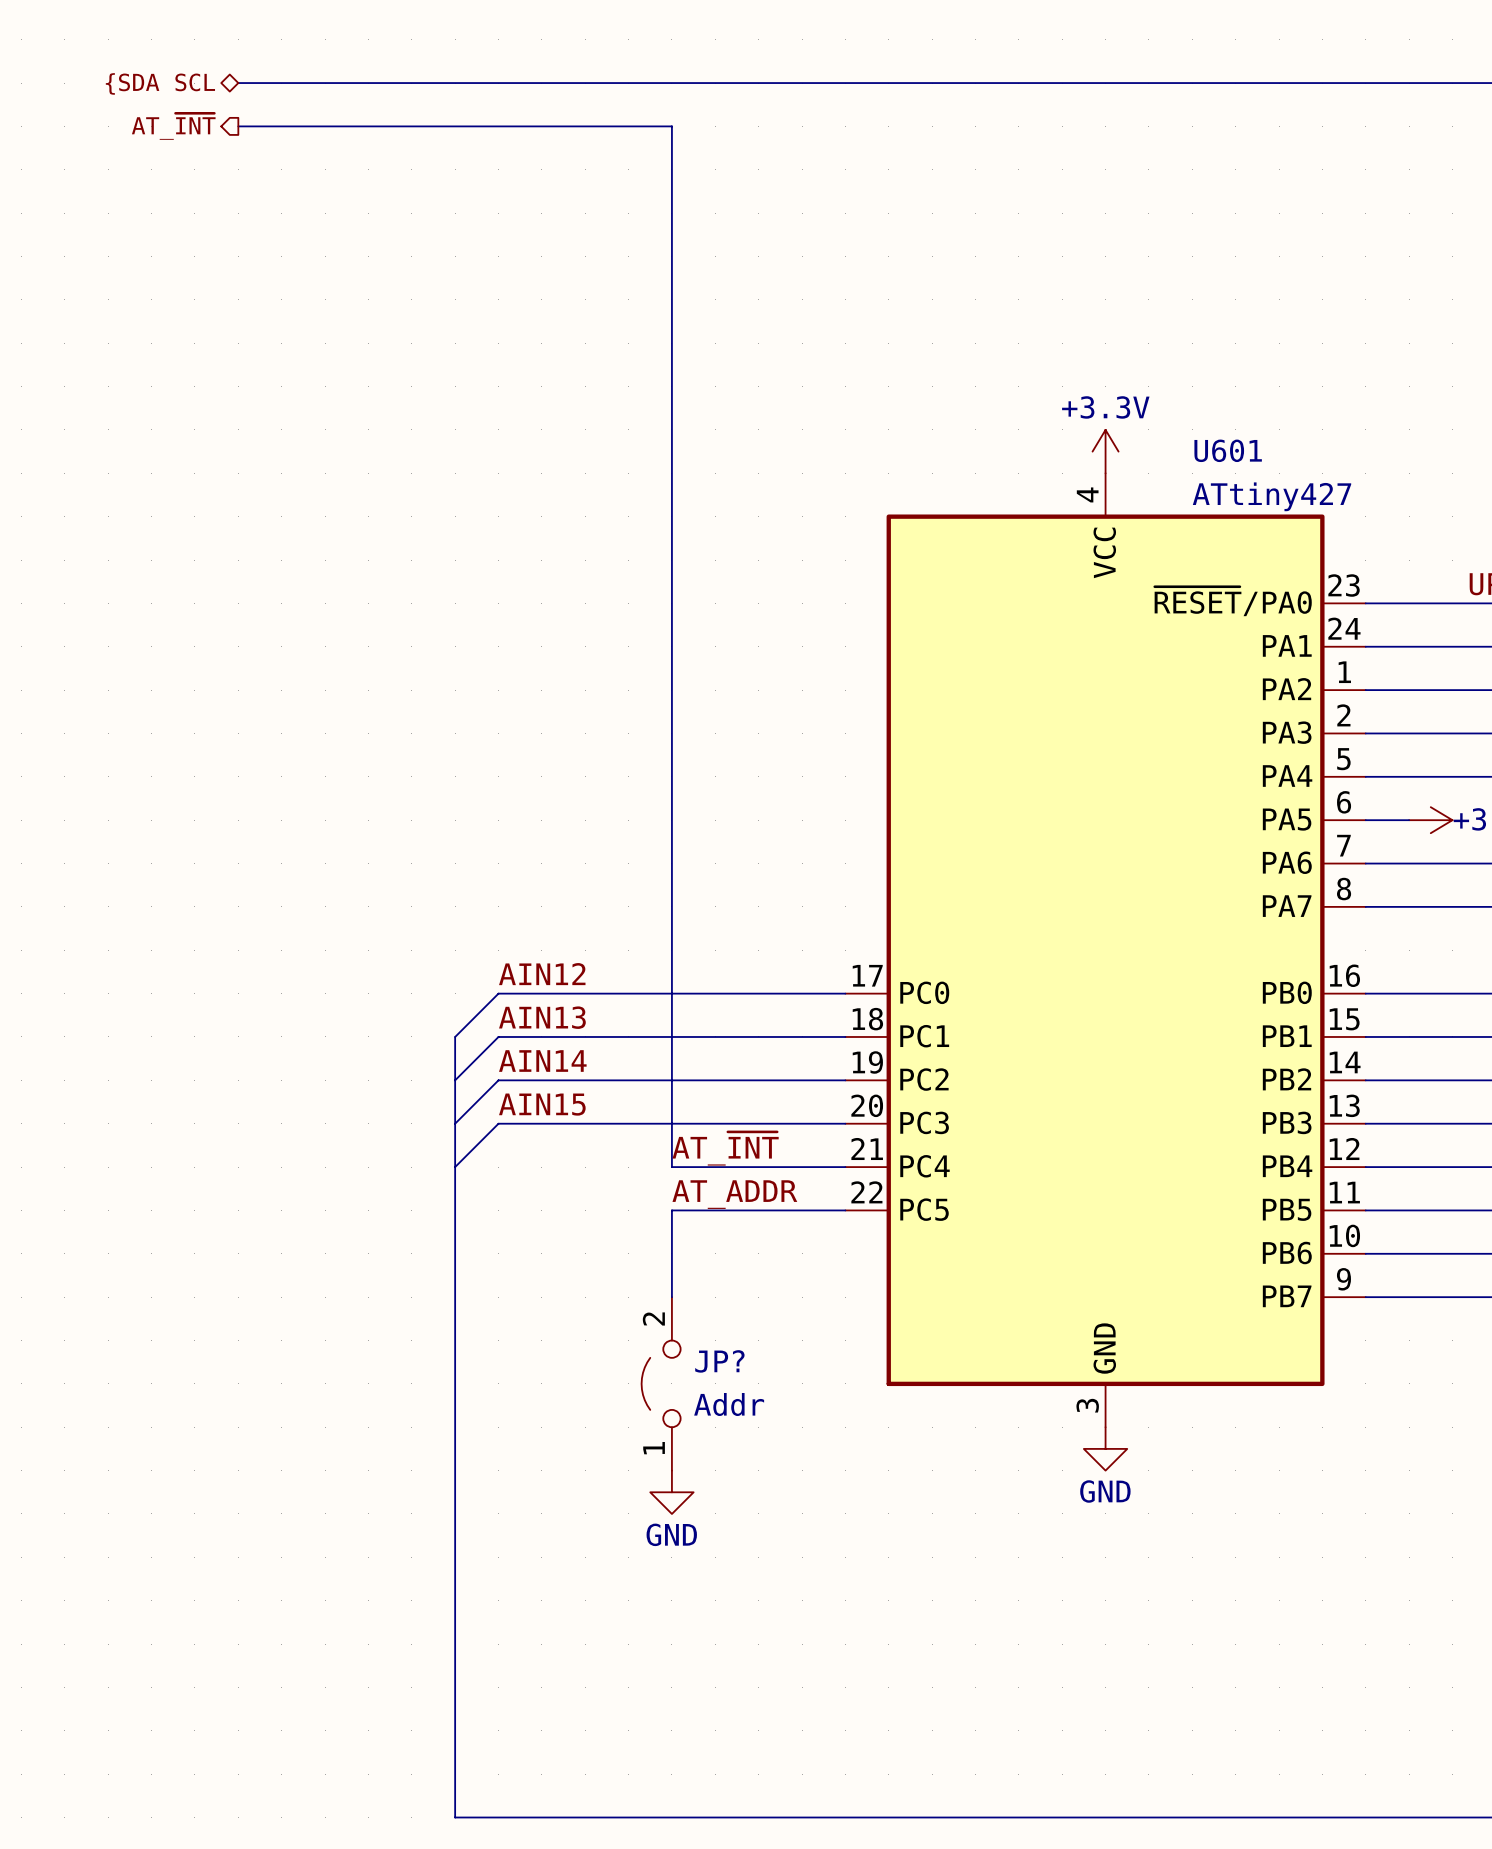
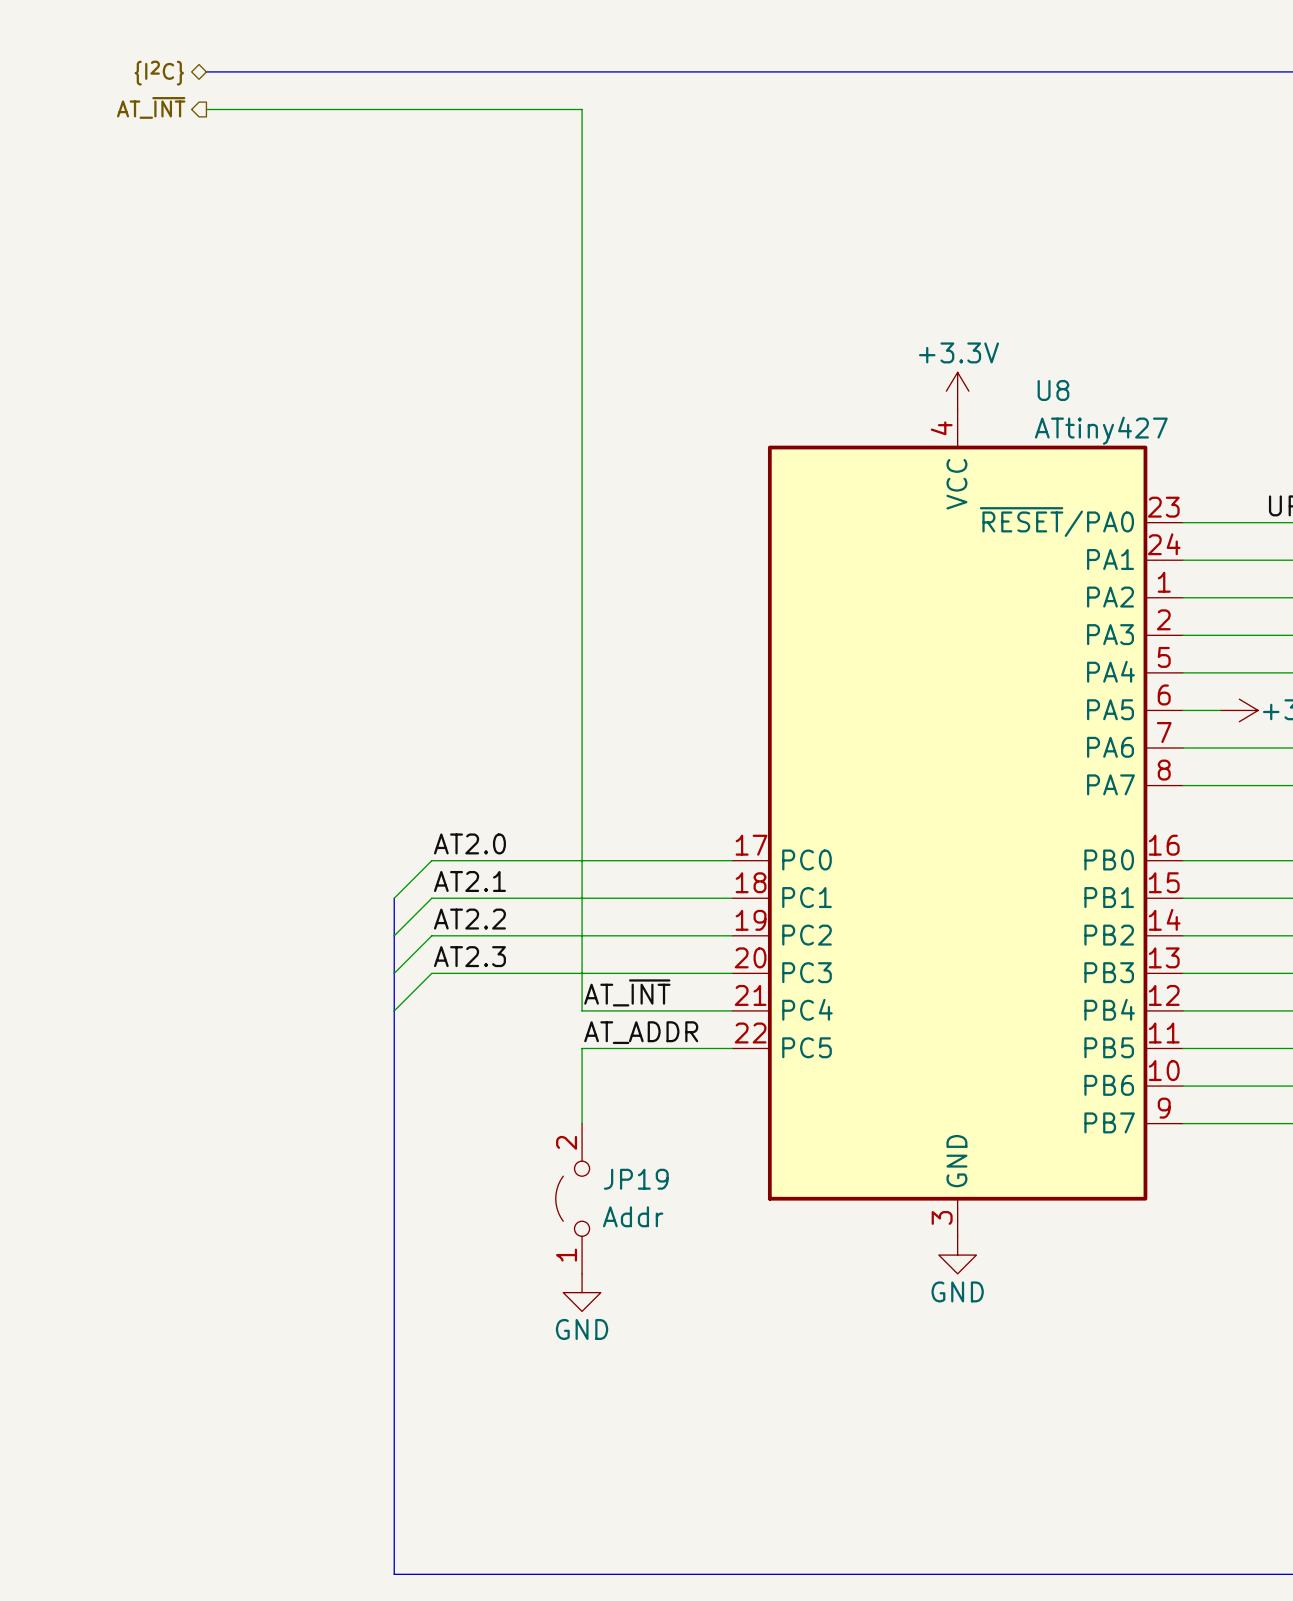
hierarchical label: {SDA SCL (160, 83) -> {I2C} (159, 73)
U601 name: U601 (1228, 450) -> U8 (1053, 390)
label: AIN12 (542, 974) -> AT2.0 (469, 843)
label: AIN13 (542, 1017) -> AT2.1 (469, 881)
label: AIN14 (542, 1061) -> AT2.2 (469, 919)
label: AIN15 (542, 1104) -> AT2.3 (469, 956)
JP? name: JP? (719, 1361) -> JP19 (636, 1179)

